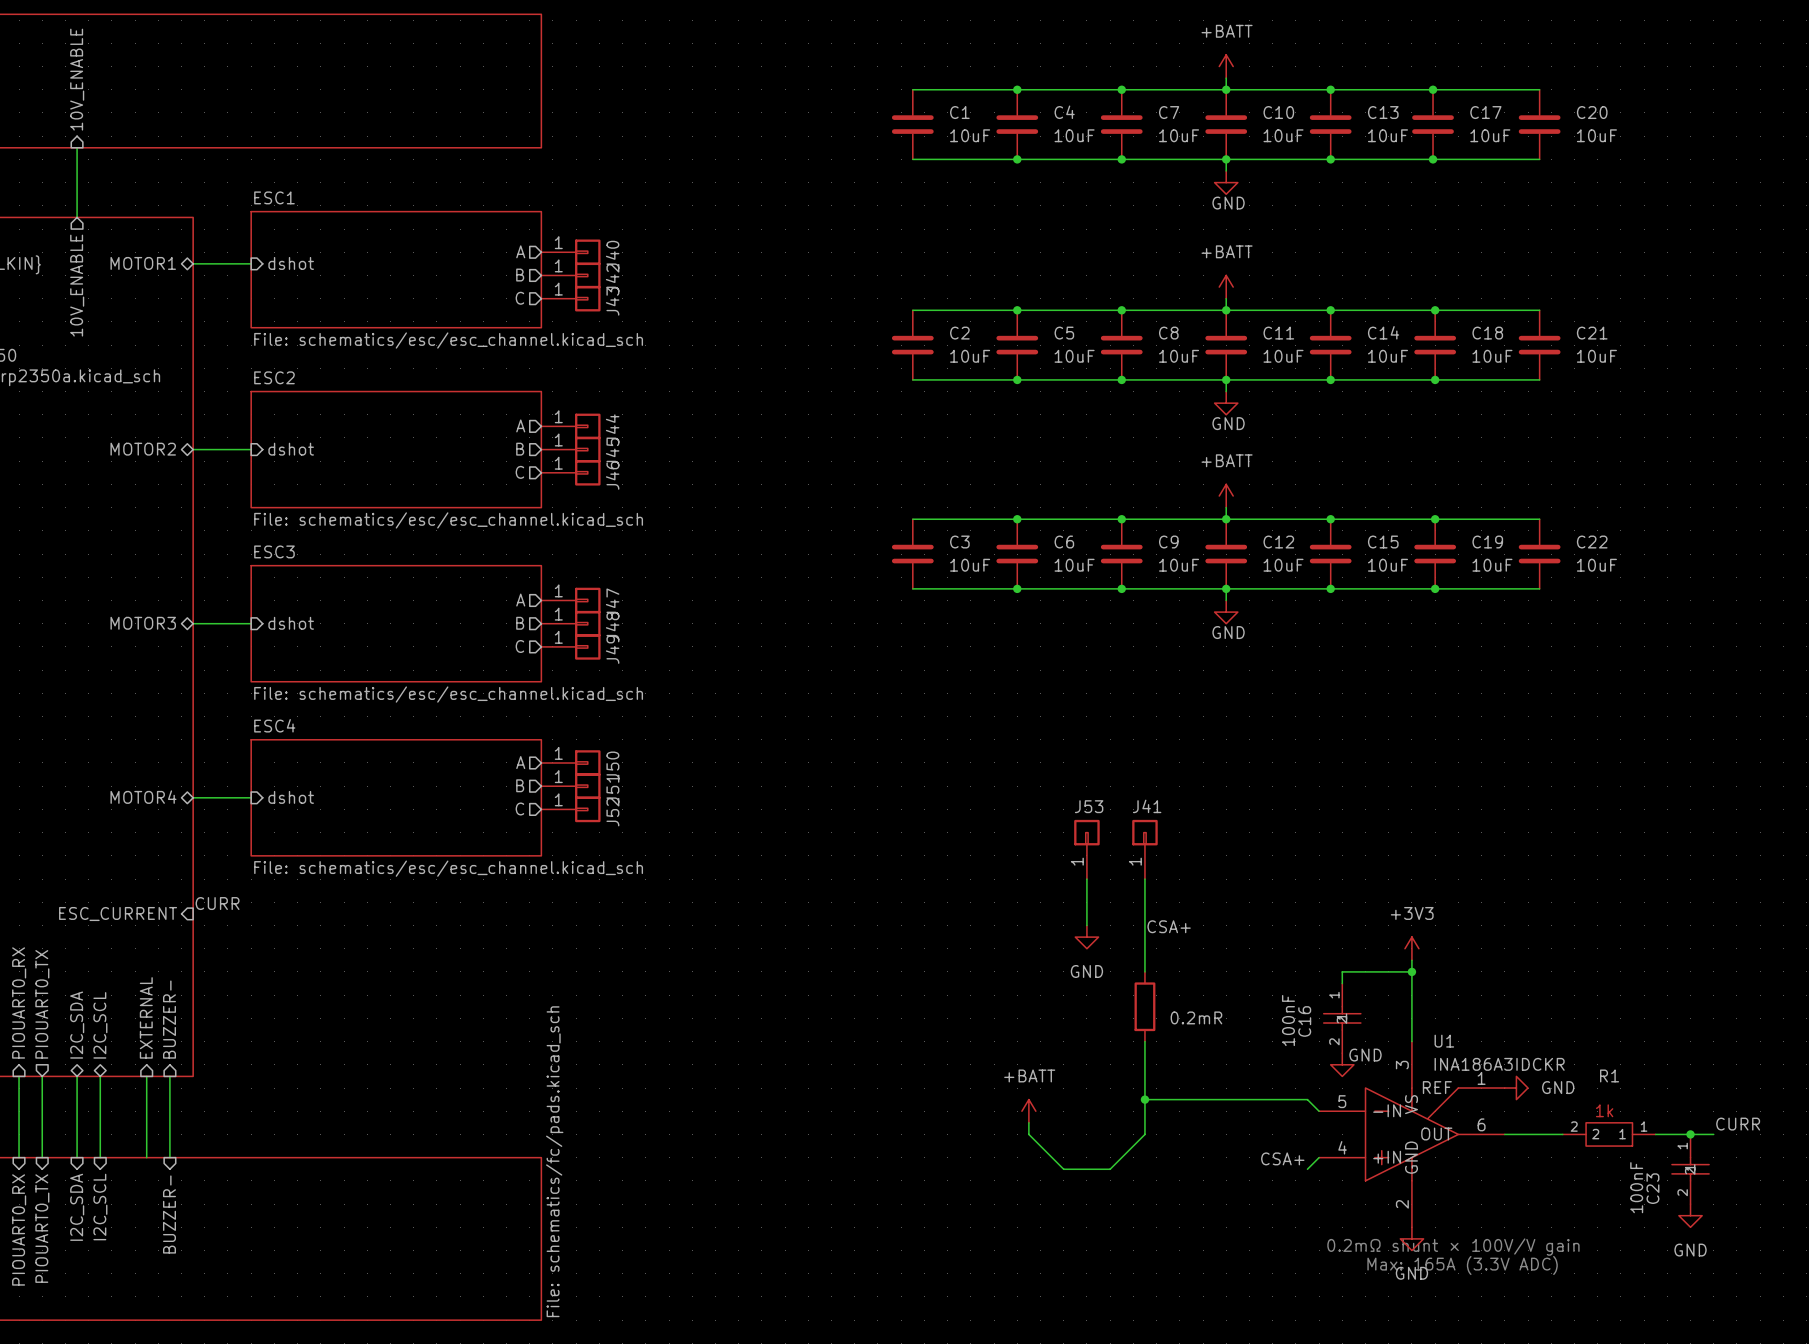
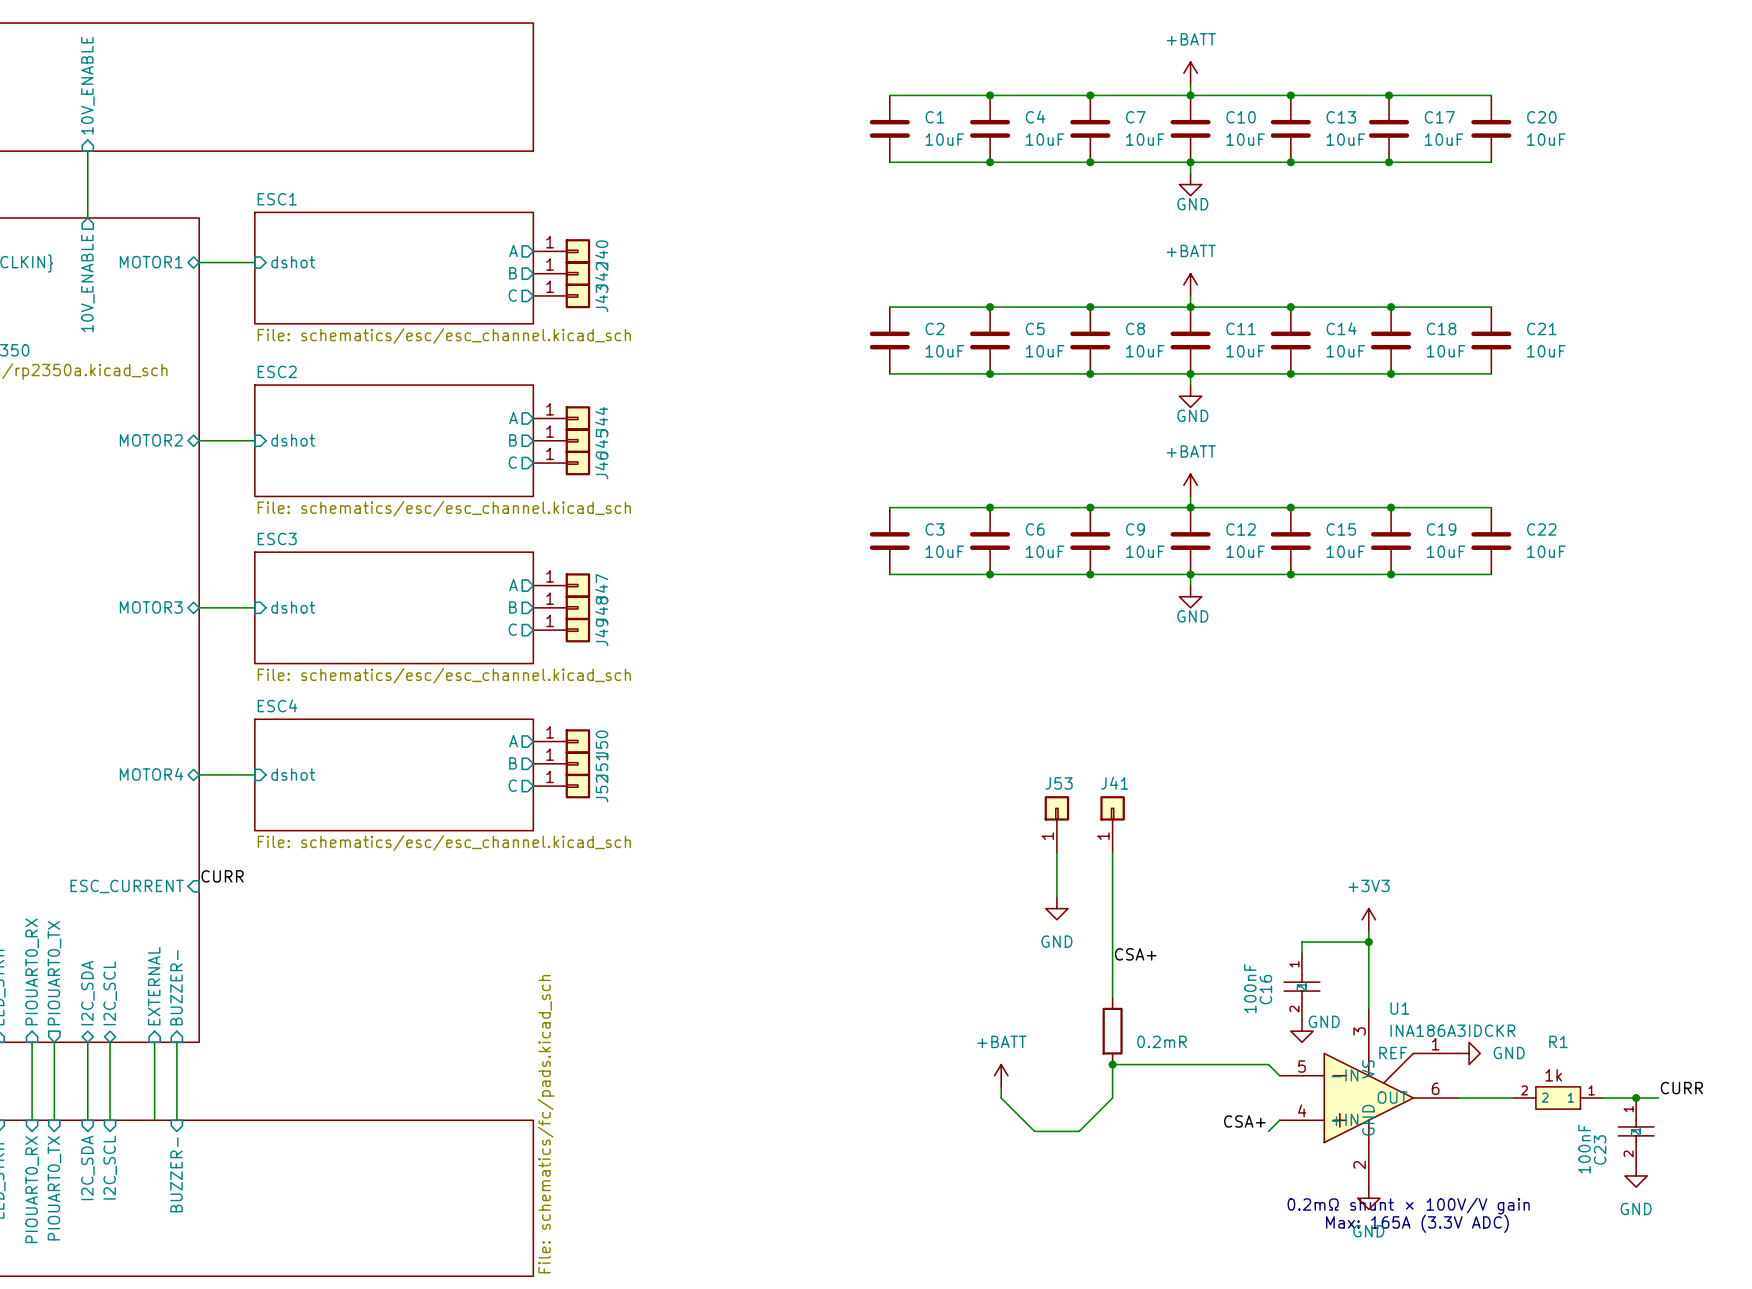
label position: CSA+ (1169, 926) -> CSA+ (1135, 954)
part position: (1144, 1006) -> (1112, 1031)
wire: (1144, 1041) (1144, 1099) -> (1112, 942) (1112, 997)

